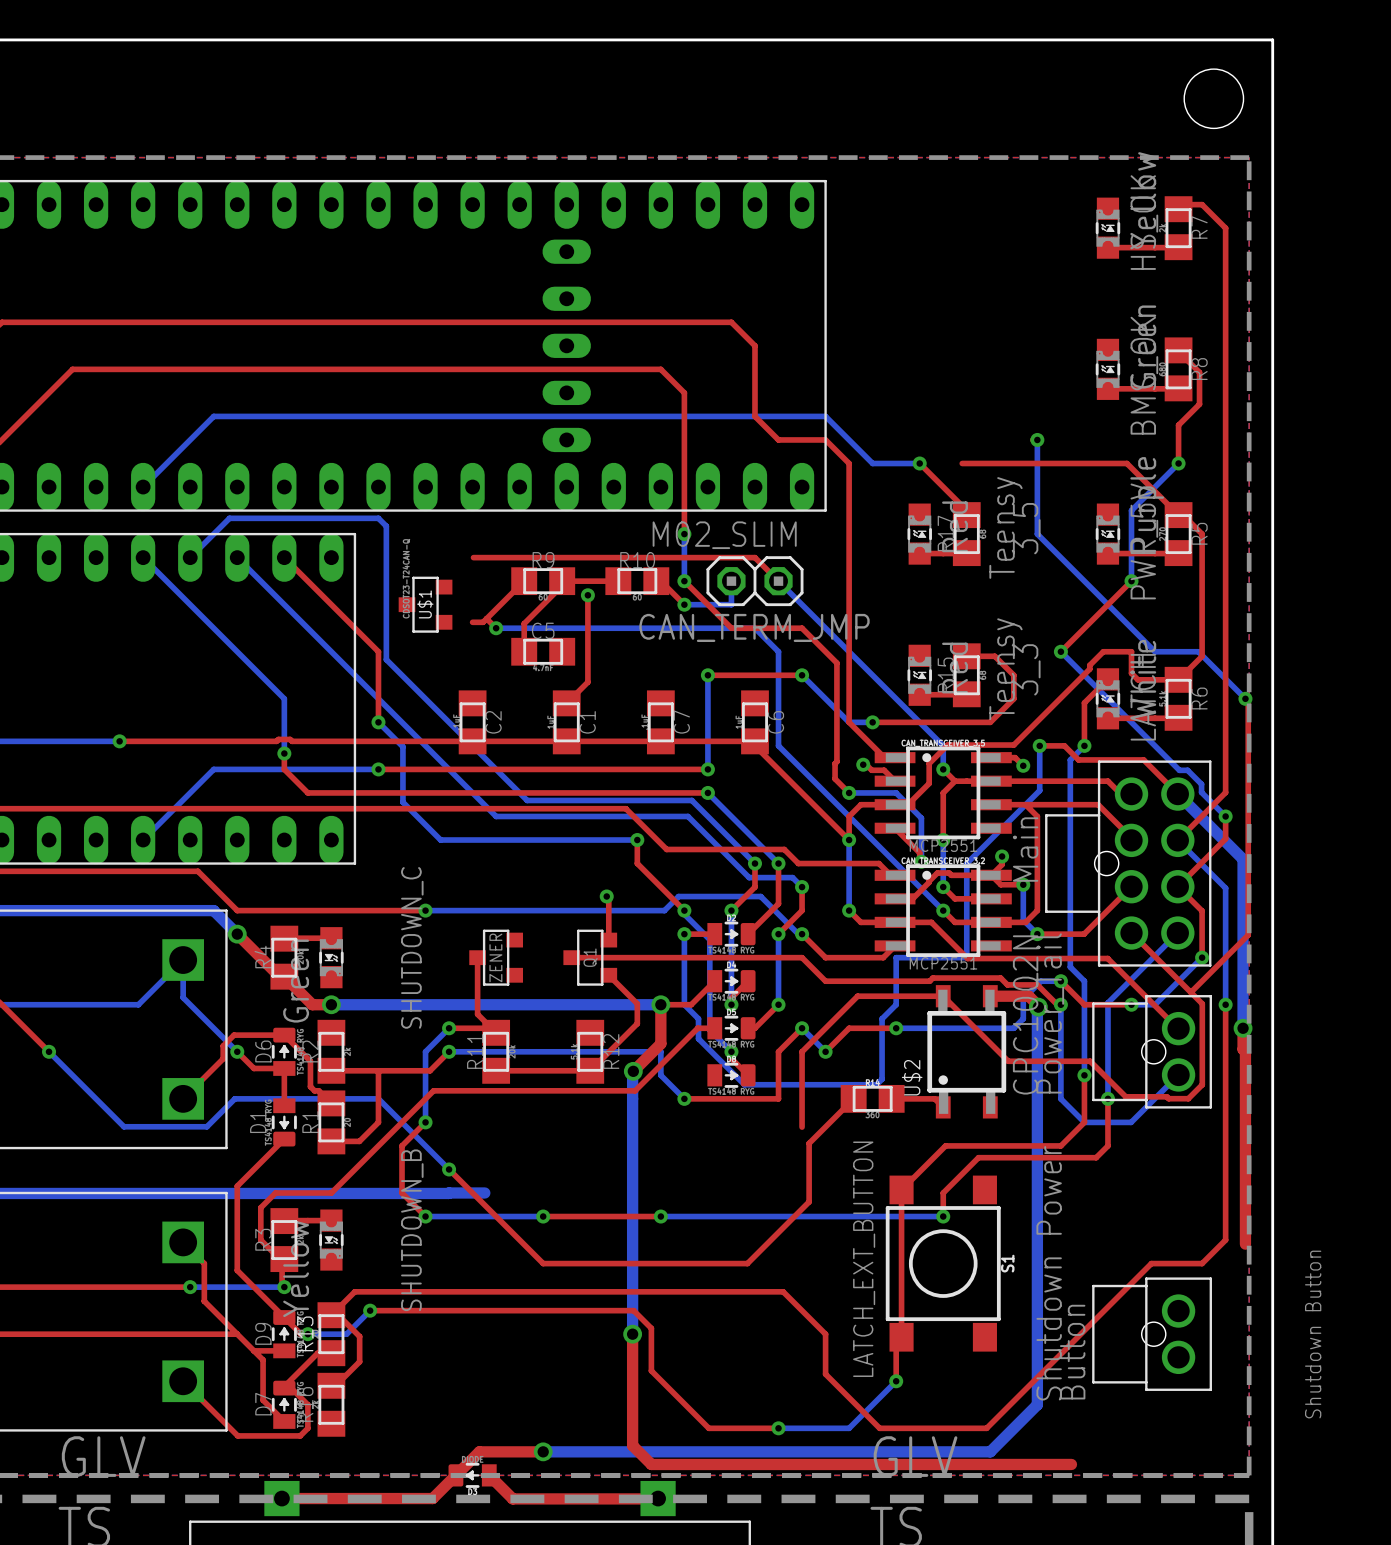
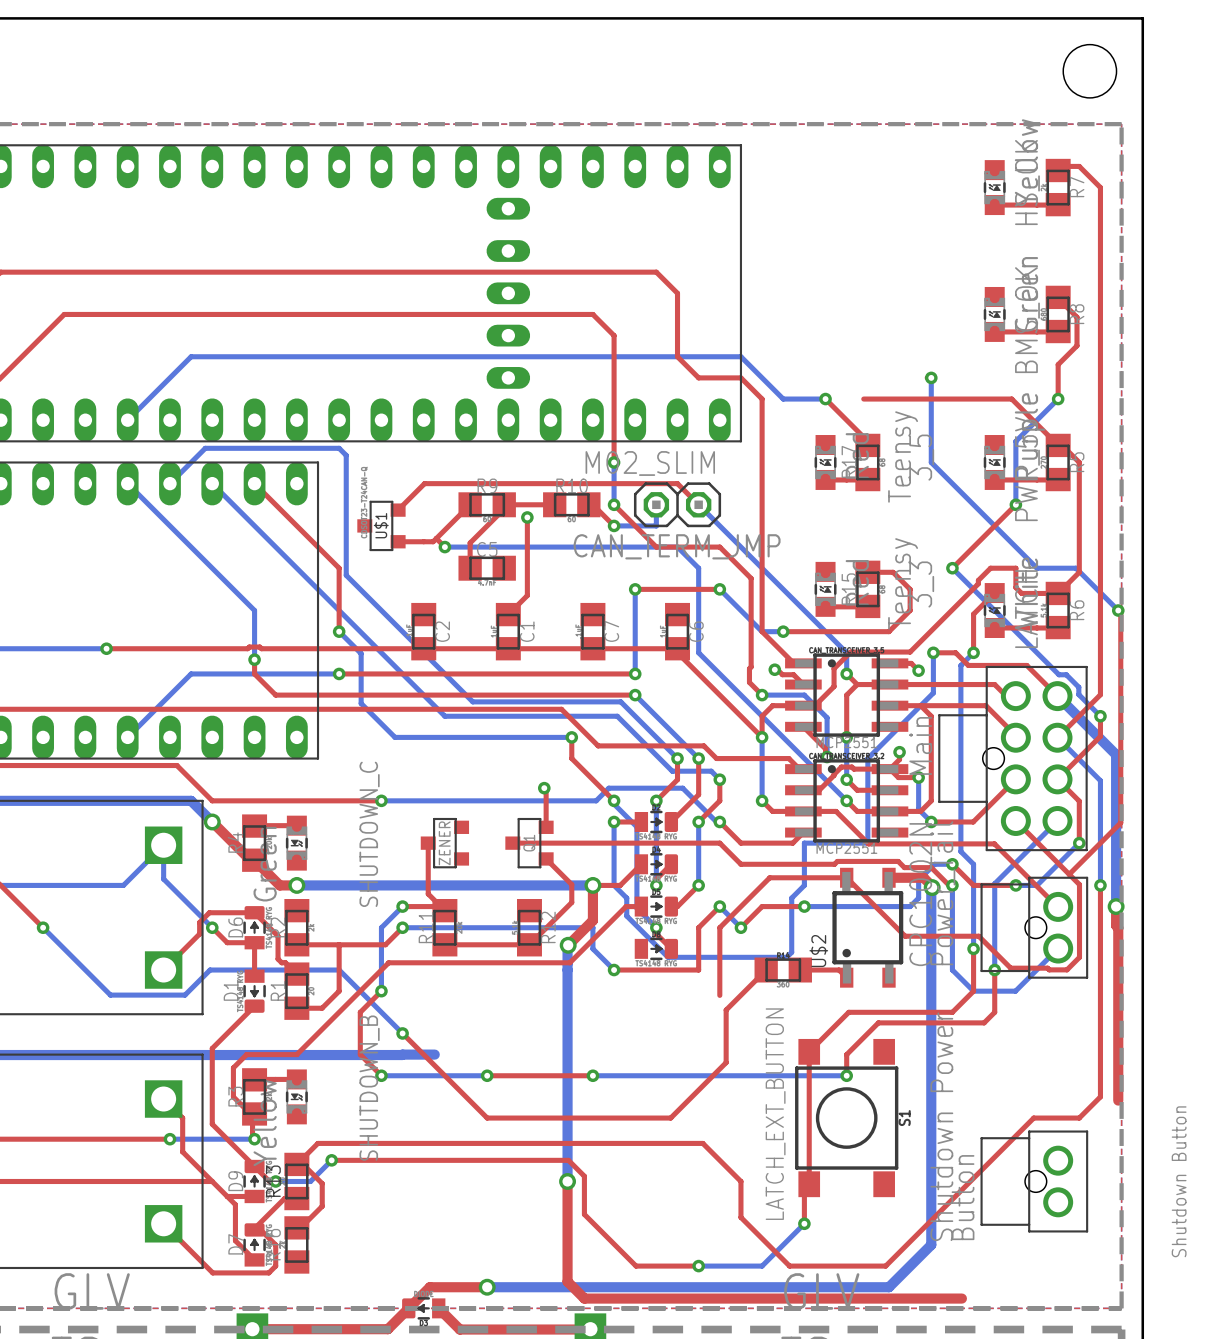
top track: none -> (424, 483) (398, 510)
top track: none -> (398, 541) (423, 541)

